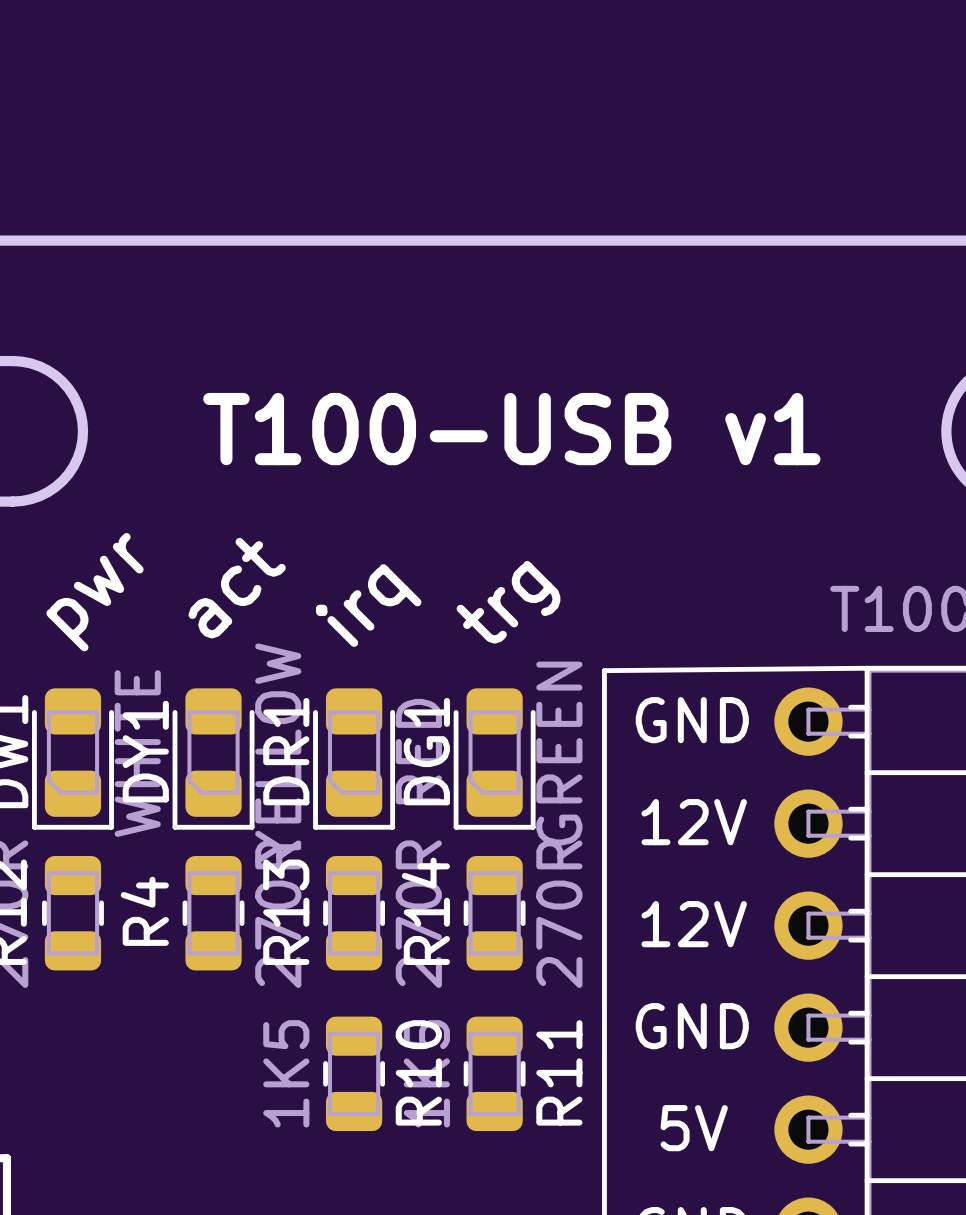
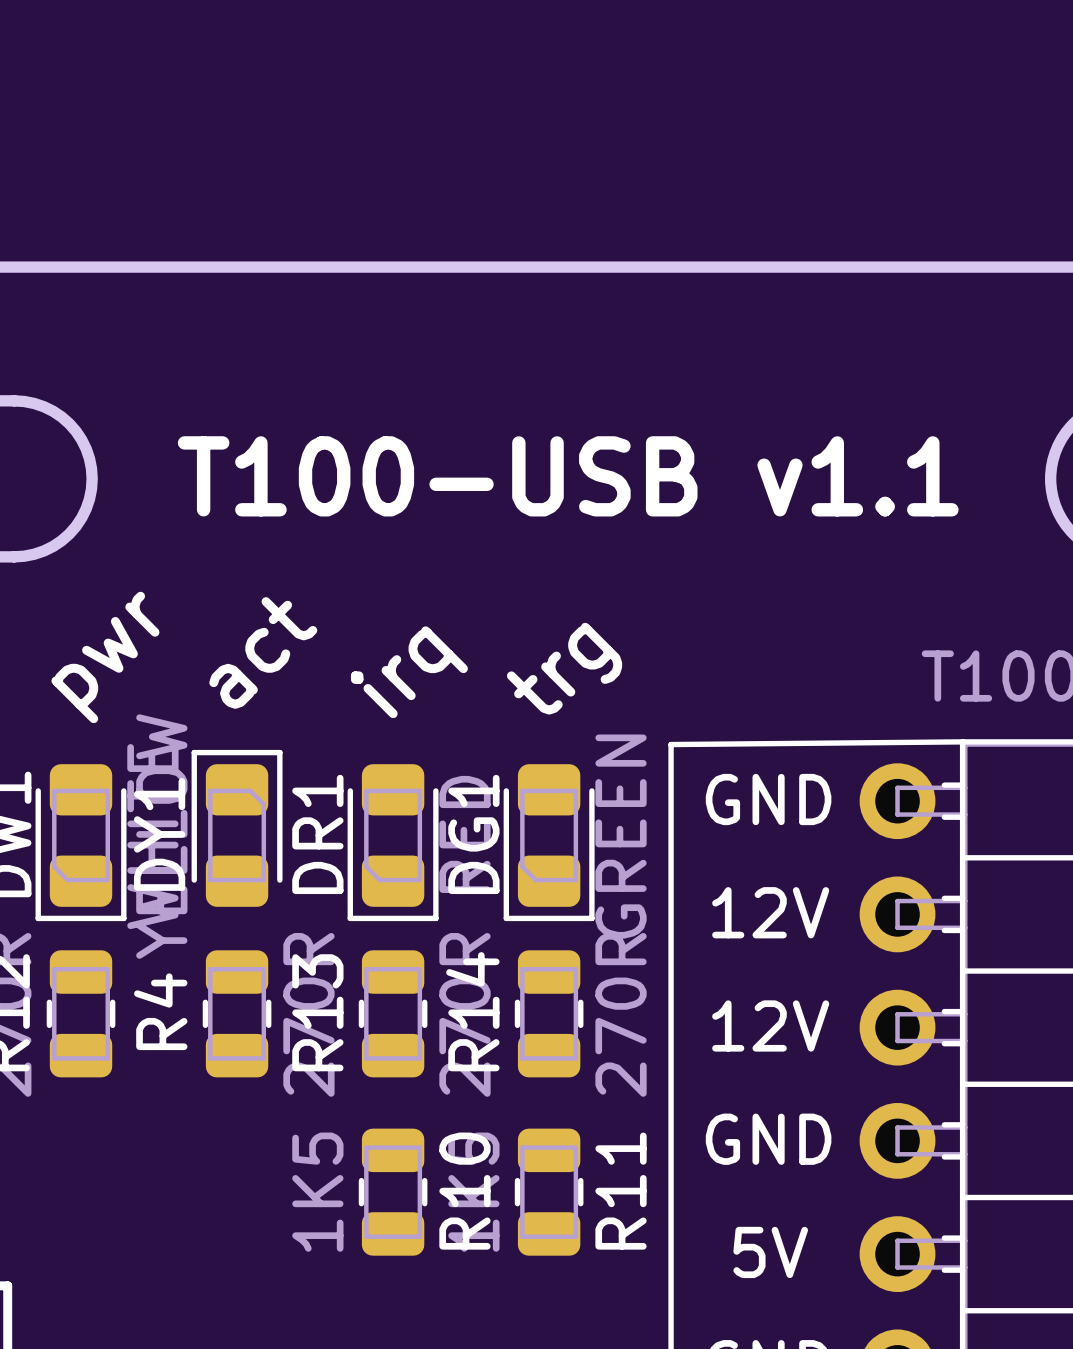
text: T100-USB v1 (511, 429) -> T100-USB v1.1 (568, 476)
DY1 rotation: 0° (213, 759) -> 180° (237, 828)

